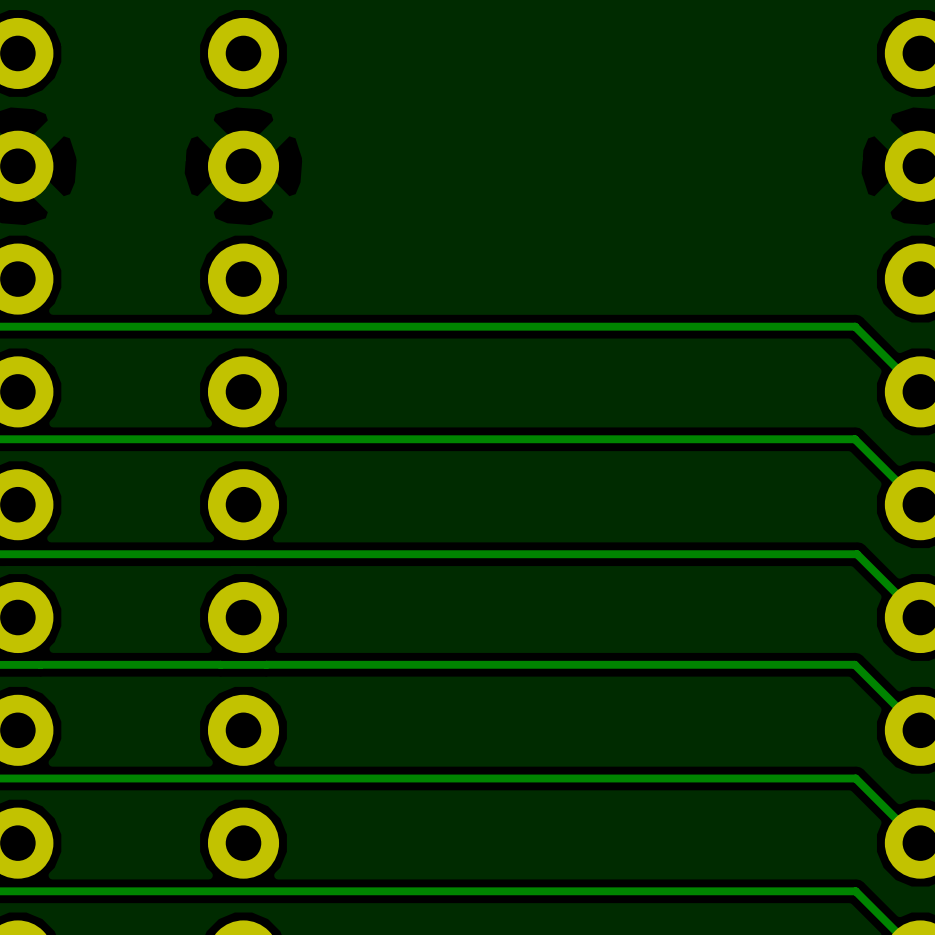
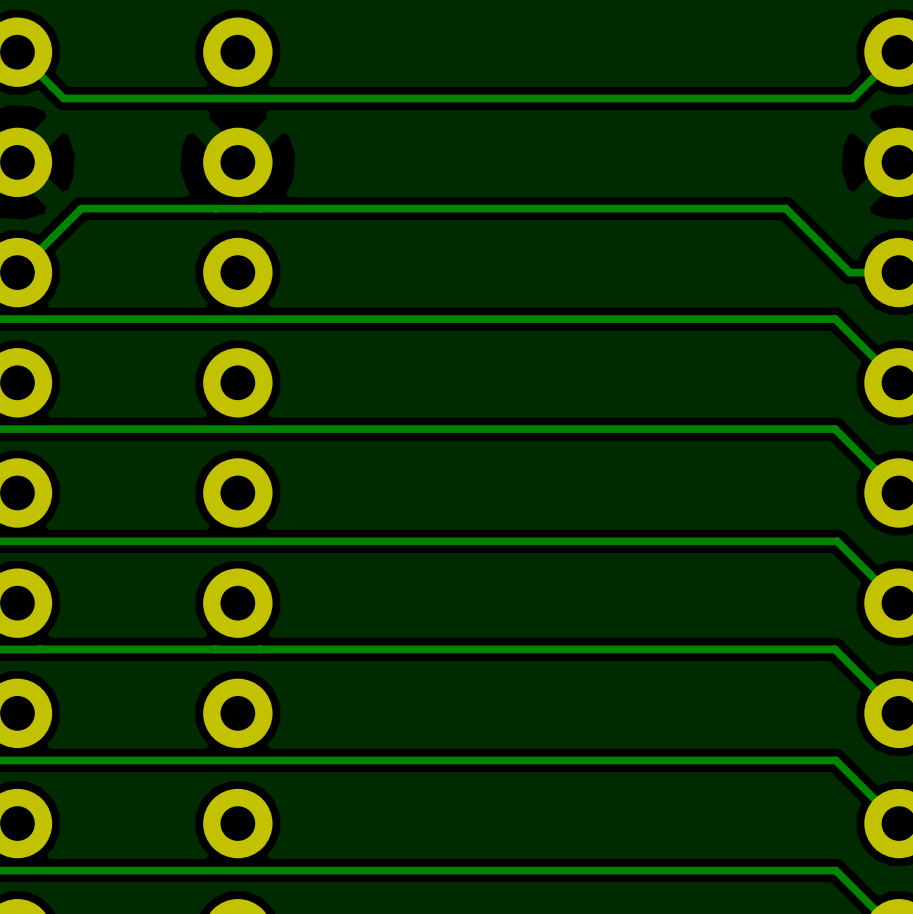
track: none -> (899, 52) (852, 98) (63, 98) (17, 52)
track: none -> (899, 272) (849, 272) (785, 208) (81, 208) (17, 272)

